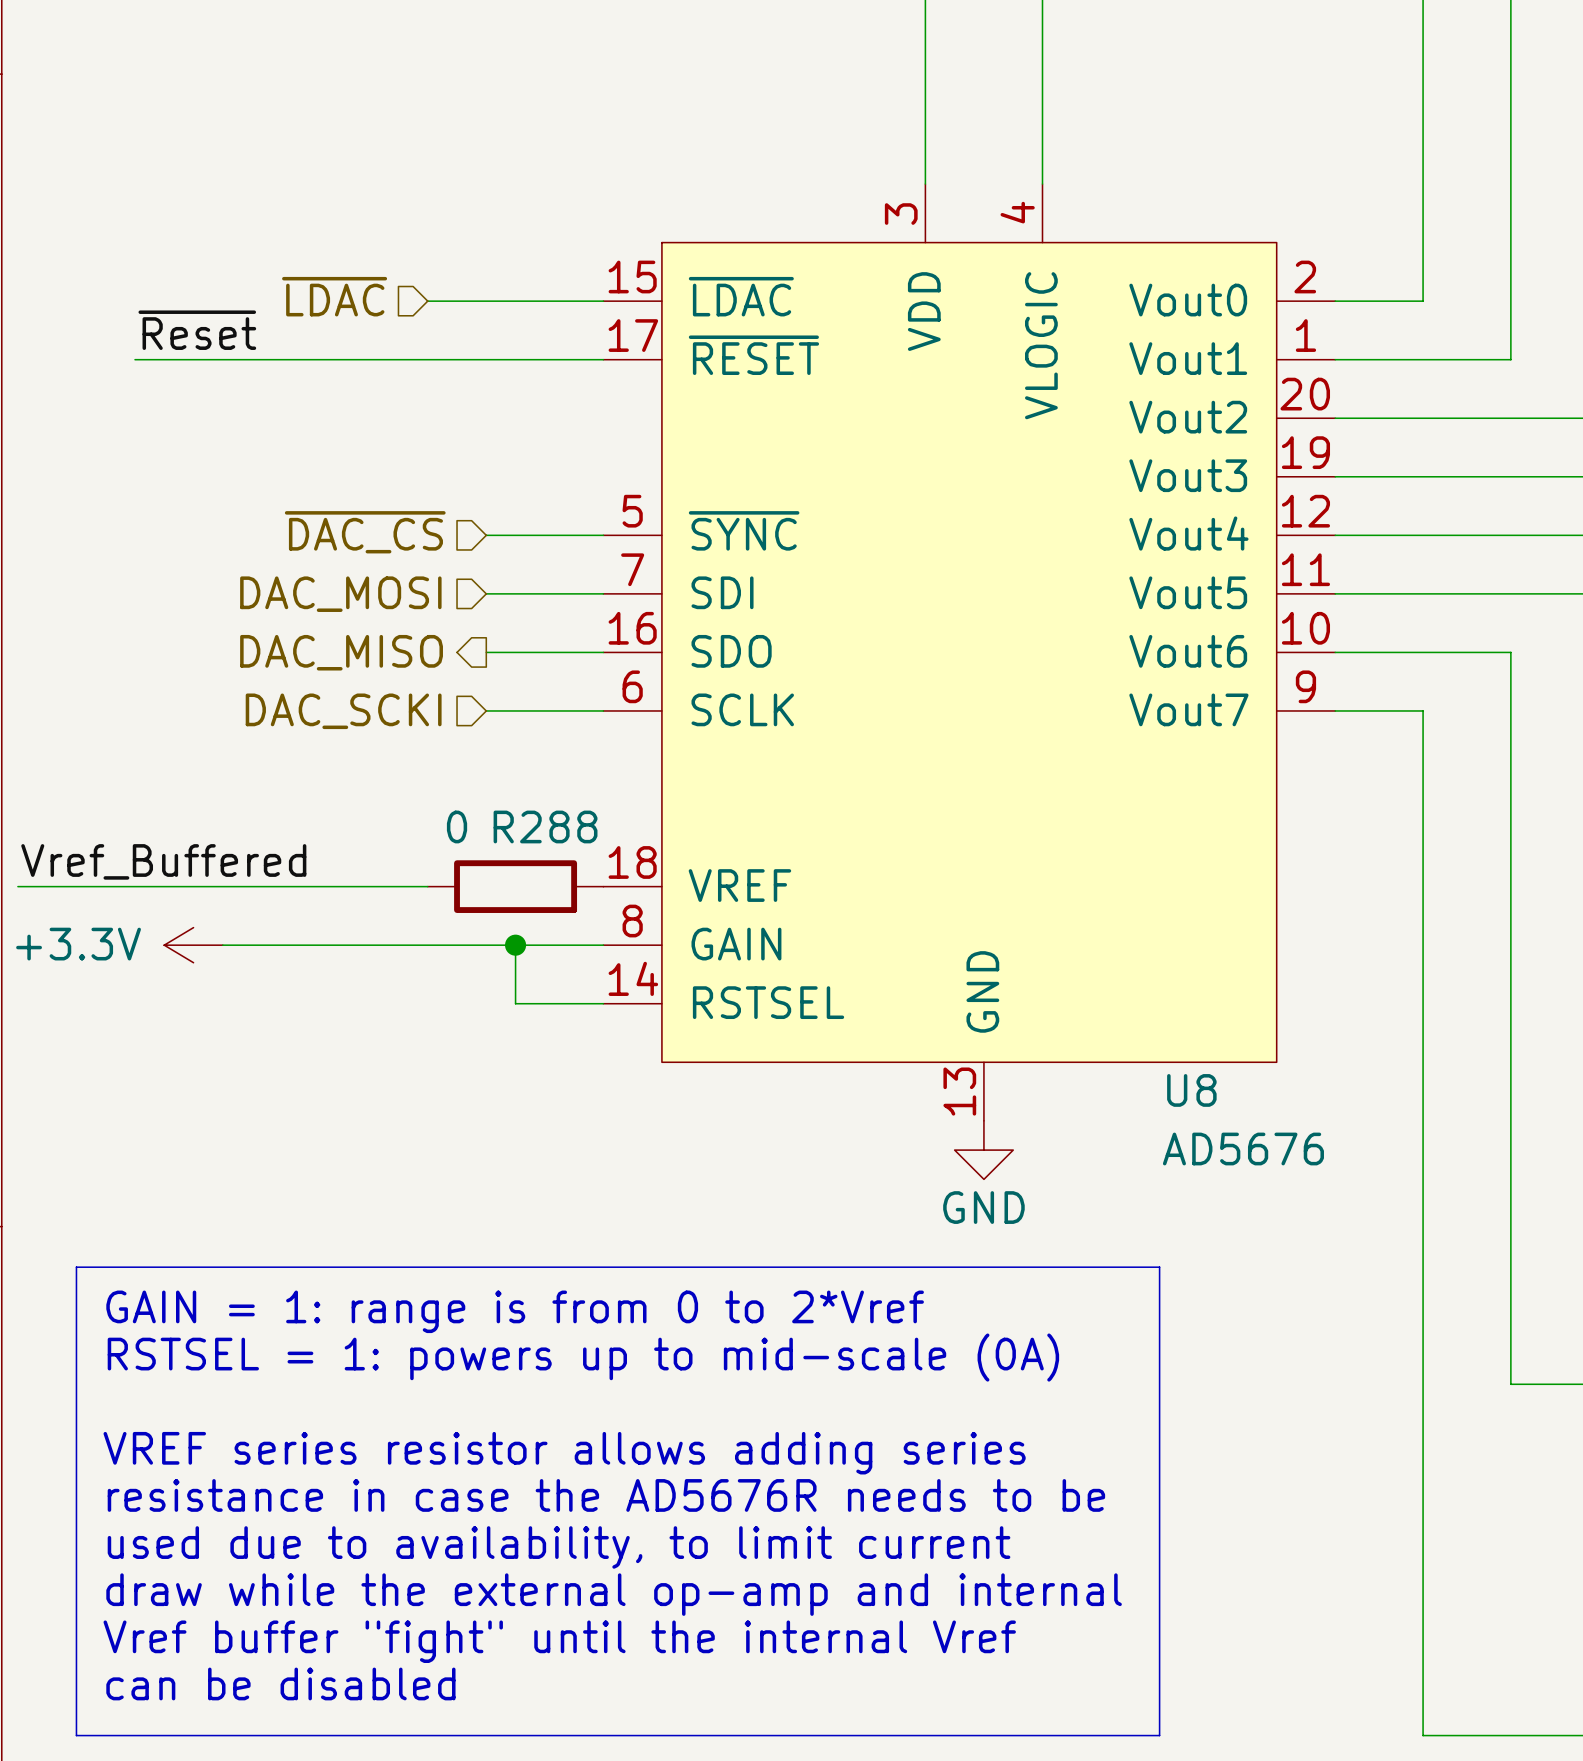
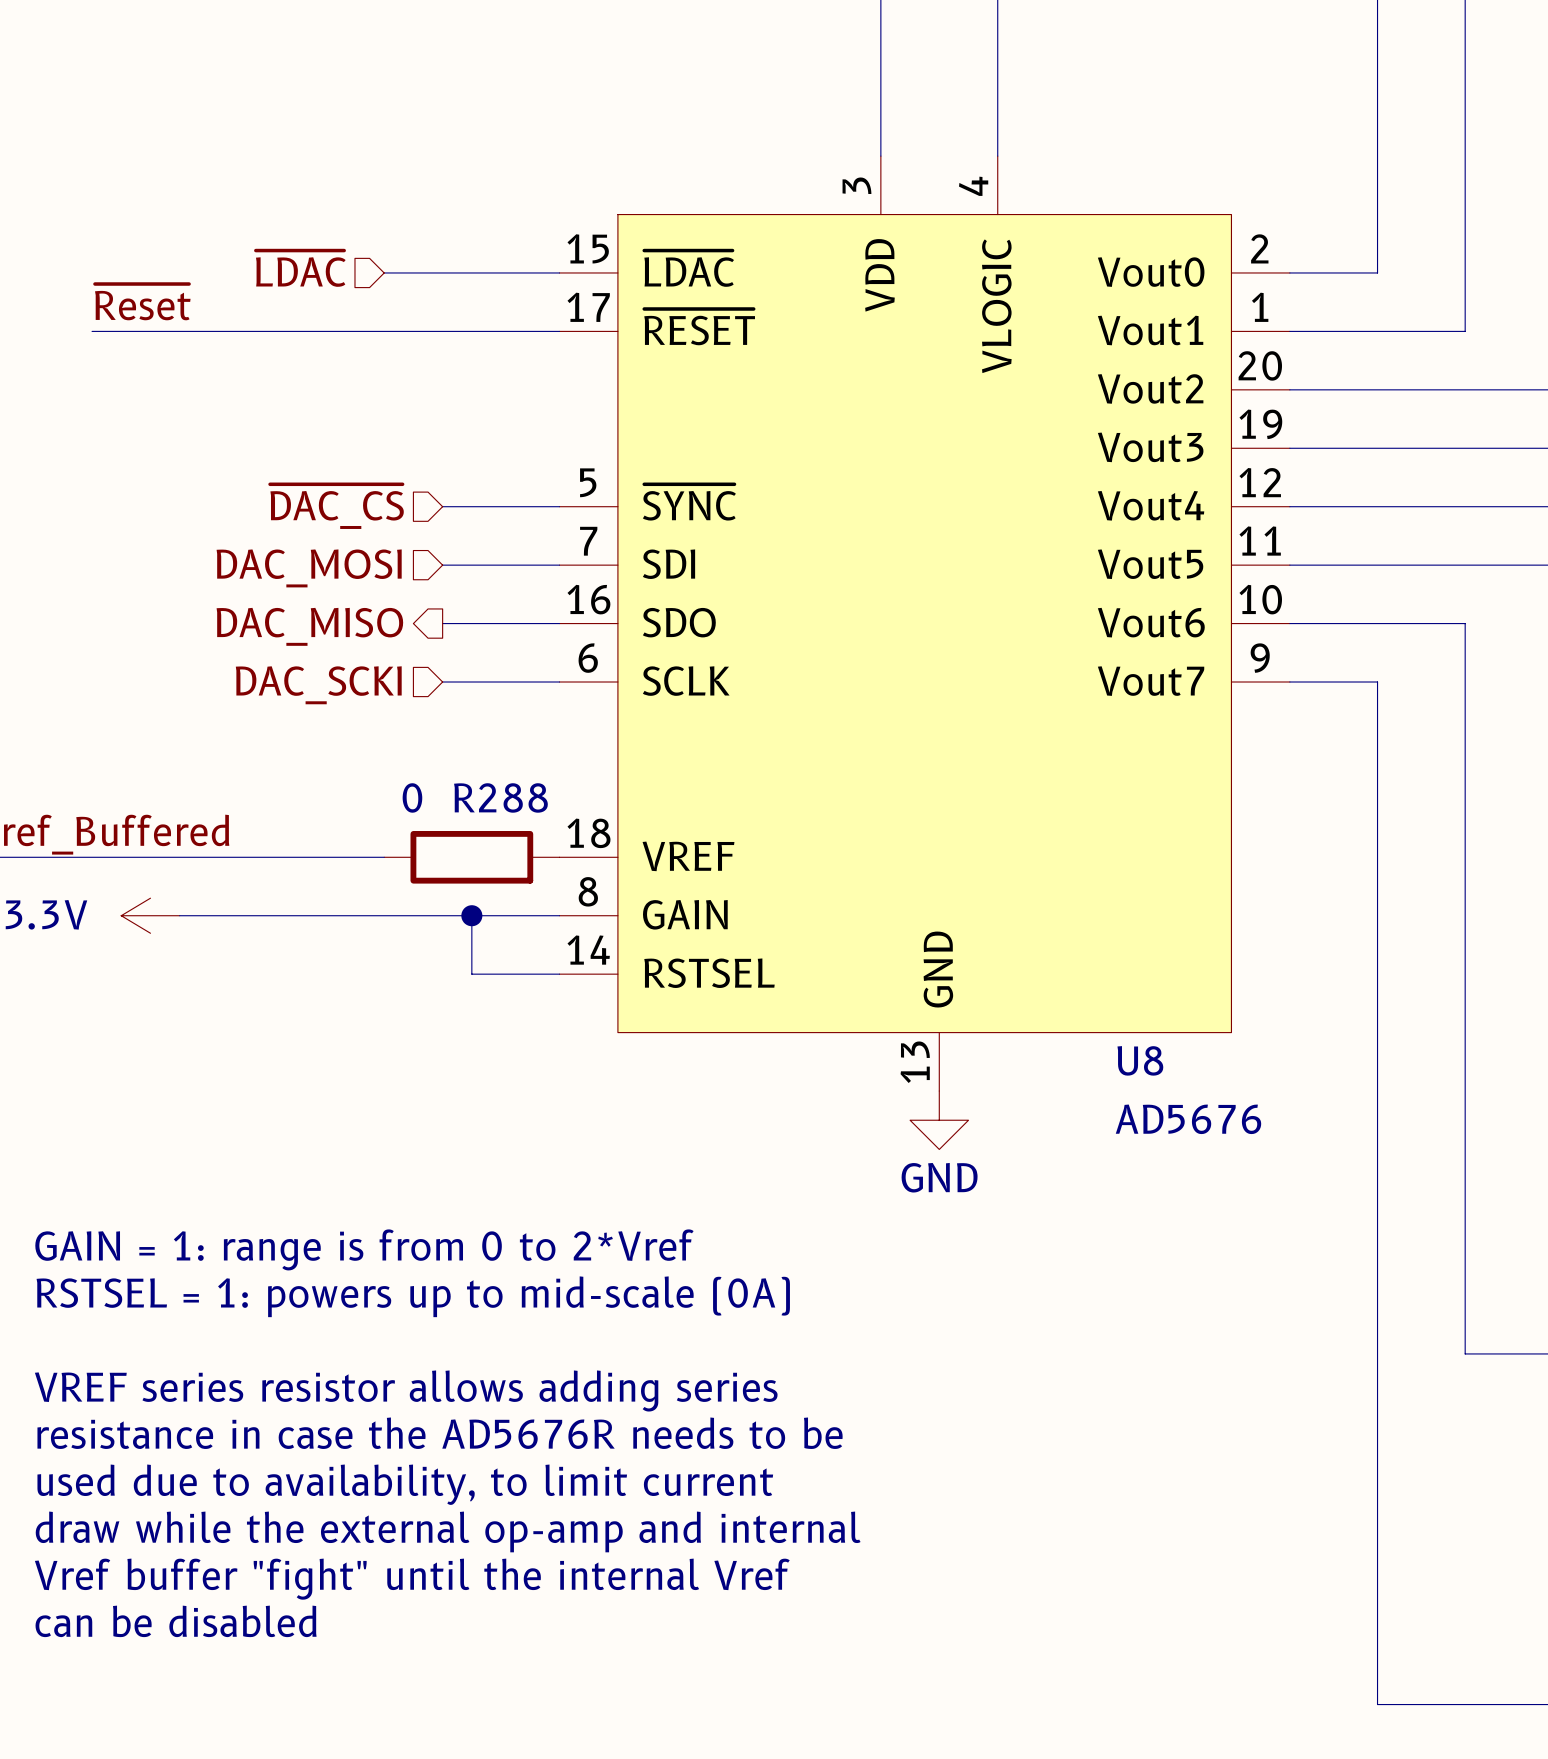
line: (76, 1267) (1159, 1267) (1159, 1735) (76, 1735) (76, 1267) -> none
text position: GAIN = 1: range is from 0 to 2*Vref (515, 1311) -> GAIN = 1: range is from 0 to 2*Vref (364, 1249)
text position: RSTSEL = 1: powers up to mid-scale (0A) (583, 1357) -> RSTSEL = 1: powers up to mid-scale (0A) (413, 1296)
text position: VREF series resistor allows adding series (564, 1453) -> VREF series resistor allows adding series (406, 1391)
text position: resistance in case the AD5676R needs to be (606, 1495) -> resistance in case the AD5676R needs to be (440, 1433)
text position: used due to availability, to limit current (559, 1547) -> used due to availability, to limit current (405, 1484)
text position: draw while the external op-amp and internal (614, 1594) -> draw while the external op-amp and internal (448, 1531)
text position: Vref buffer "fight" until the internal Vref (559, 1641) -> Vref buffer "fight" until the internal Vref (412, 1579)
text position: can be disabled (280, 1683) -> can be disabled (176, 1621)

